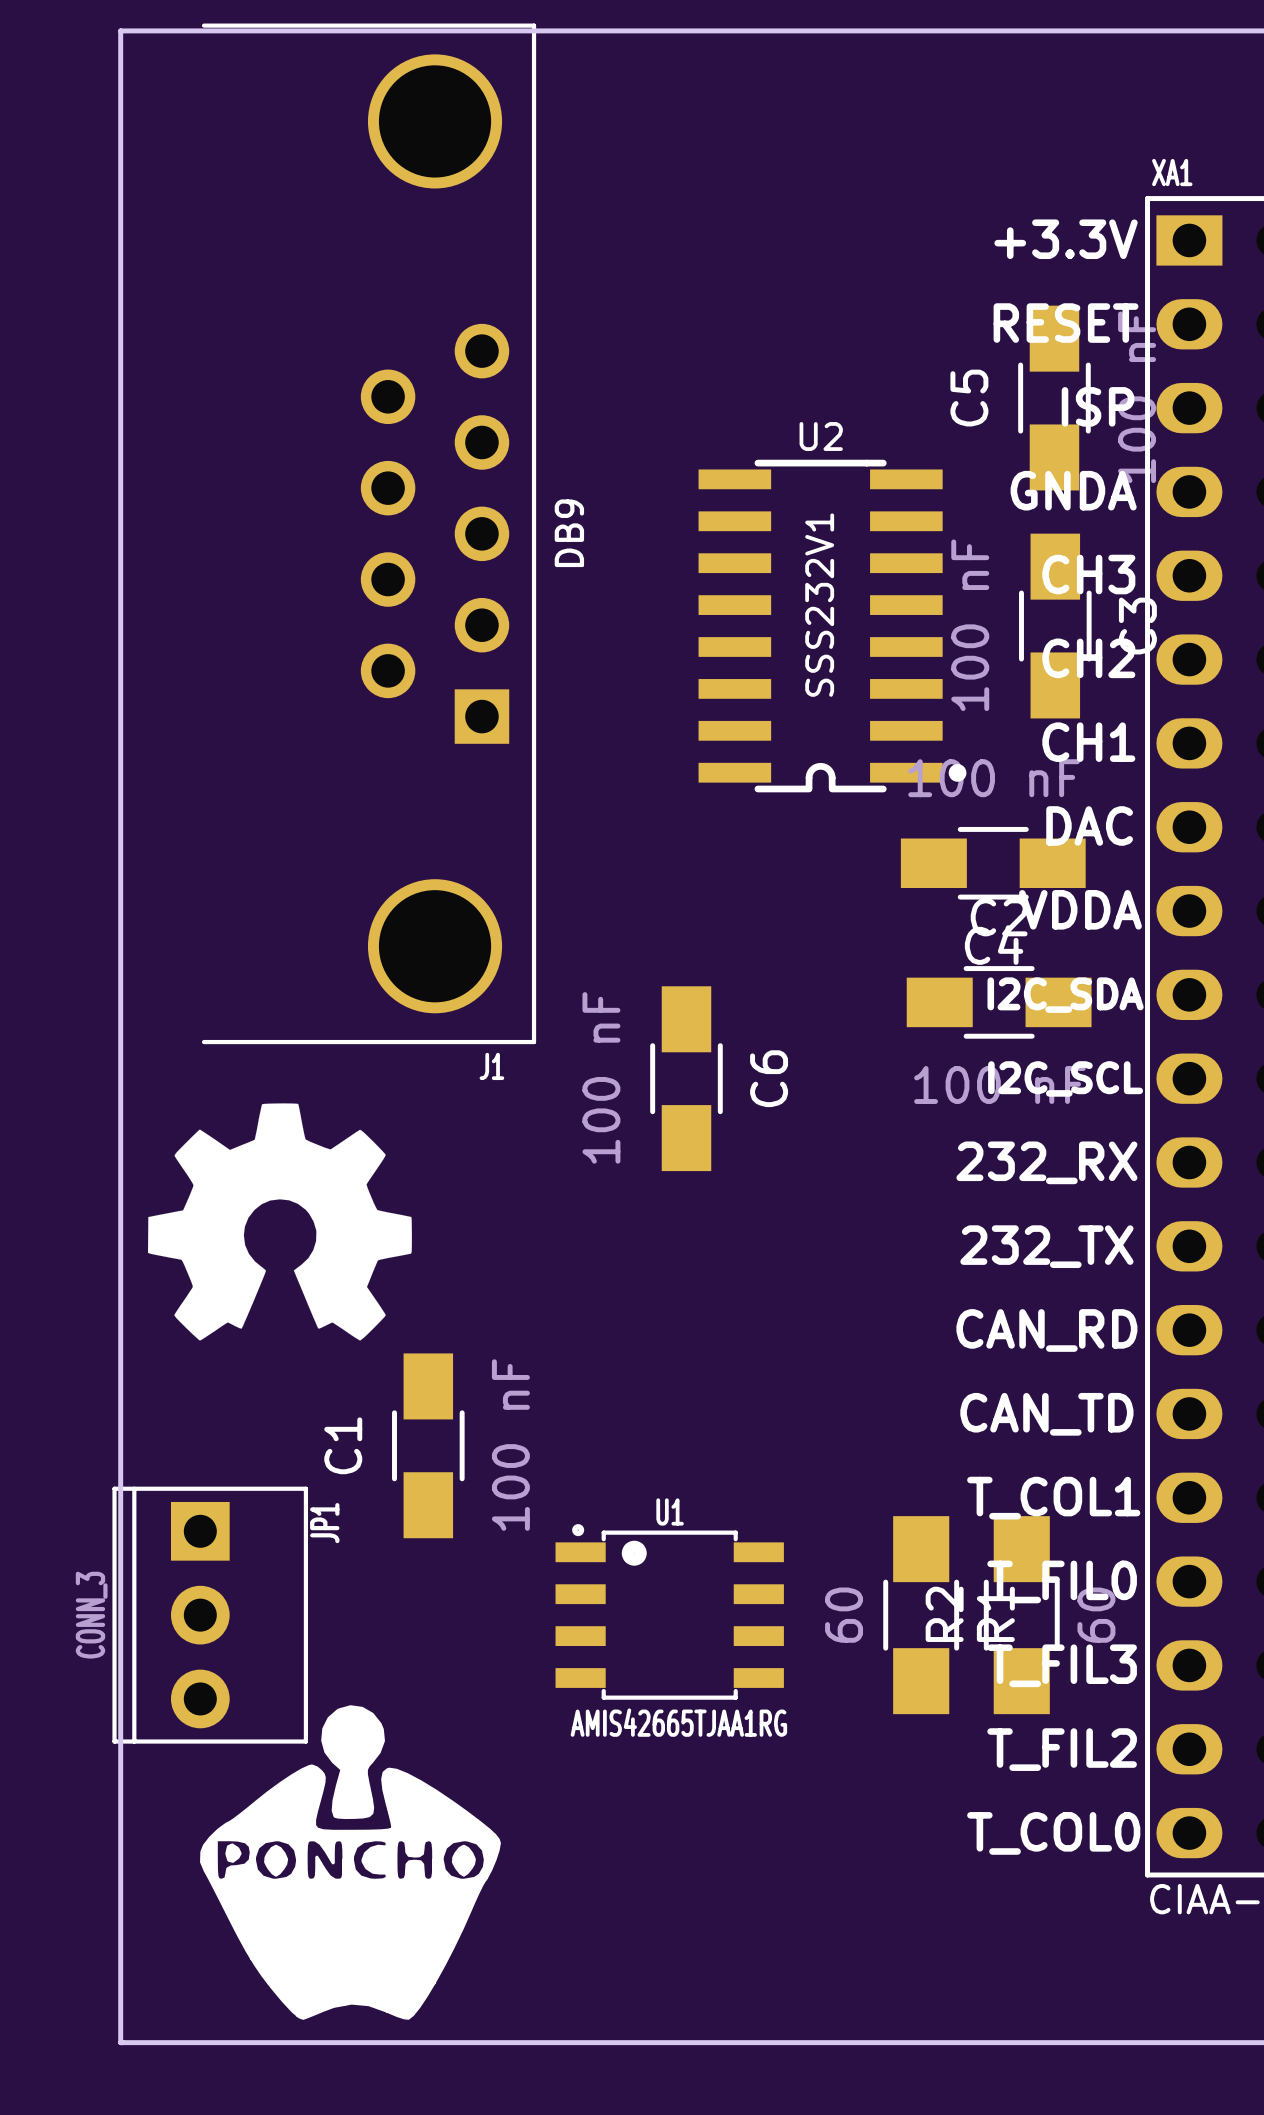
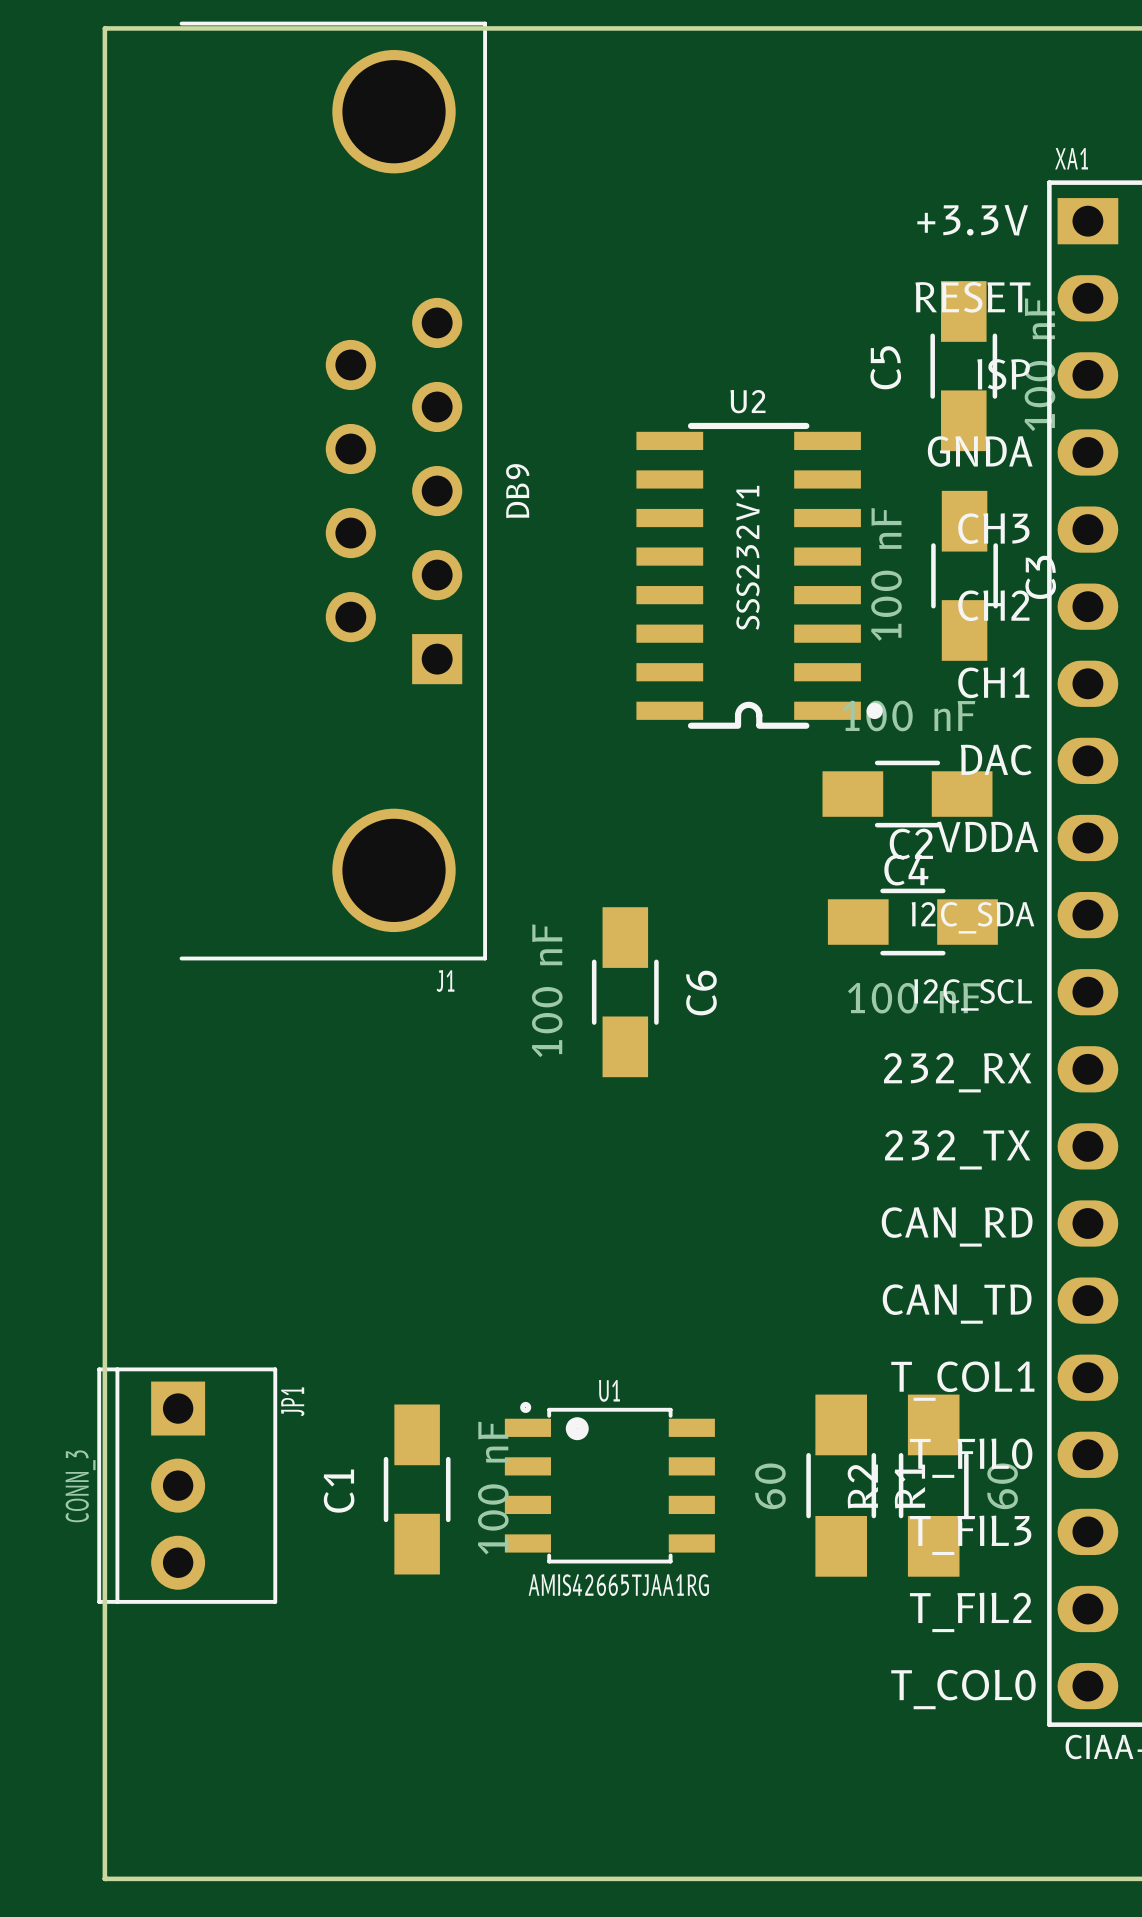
drawing: [147, 1103, 412, 1341] -> none
C1 position: (428, 1445) -> (417, 1489)
drawing: [200, 1705, 501, 2020] -> none

